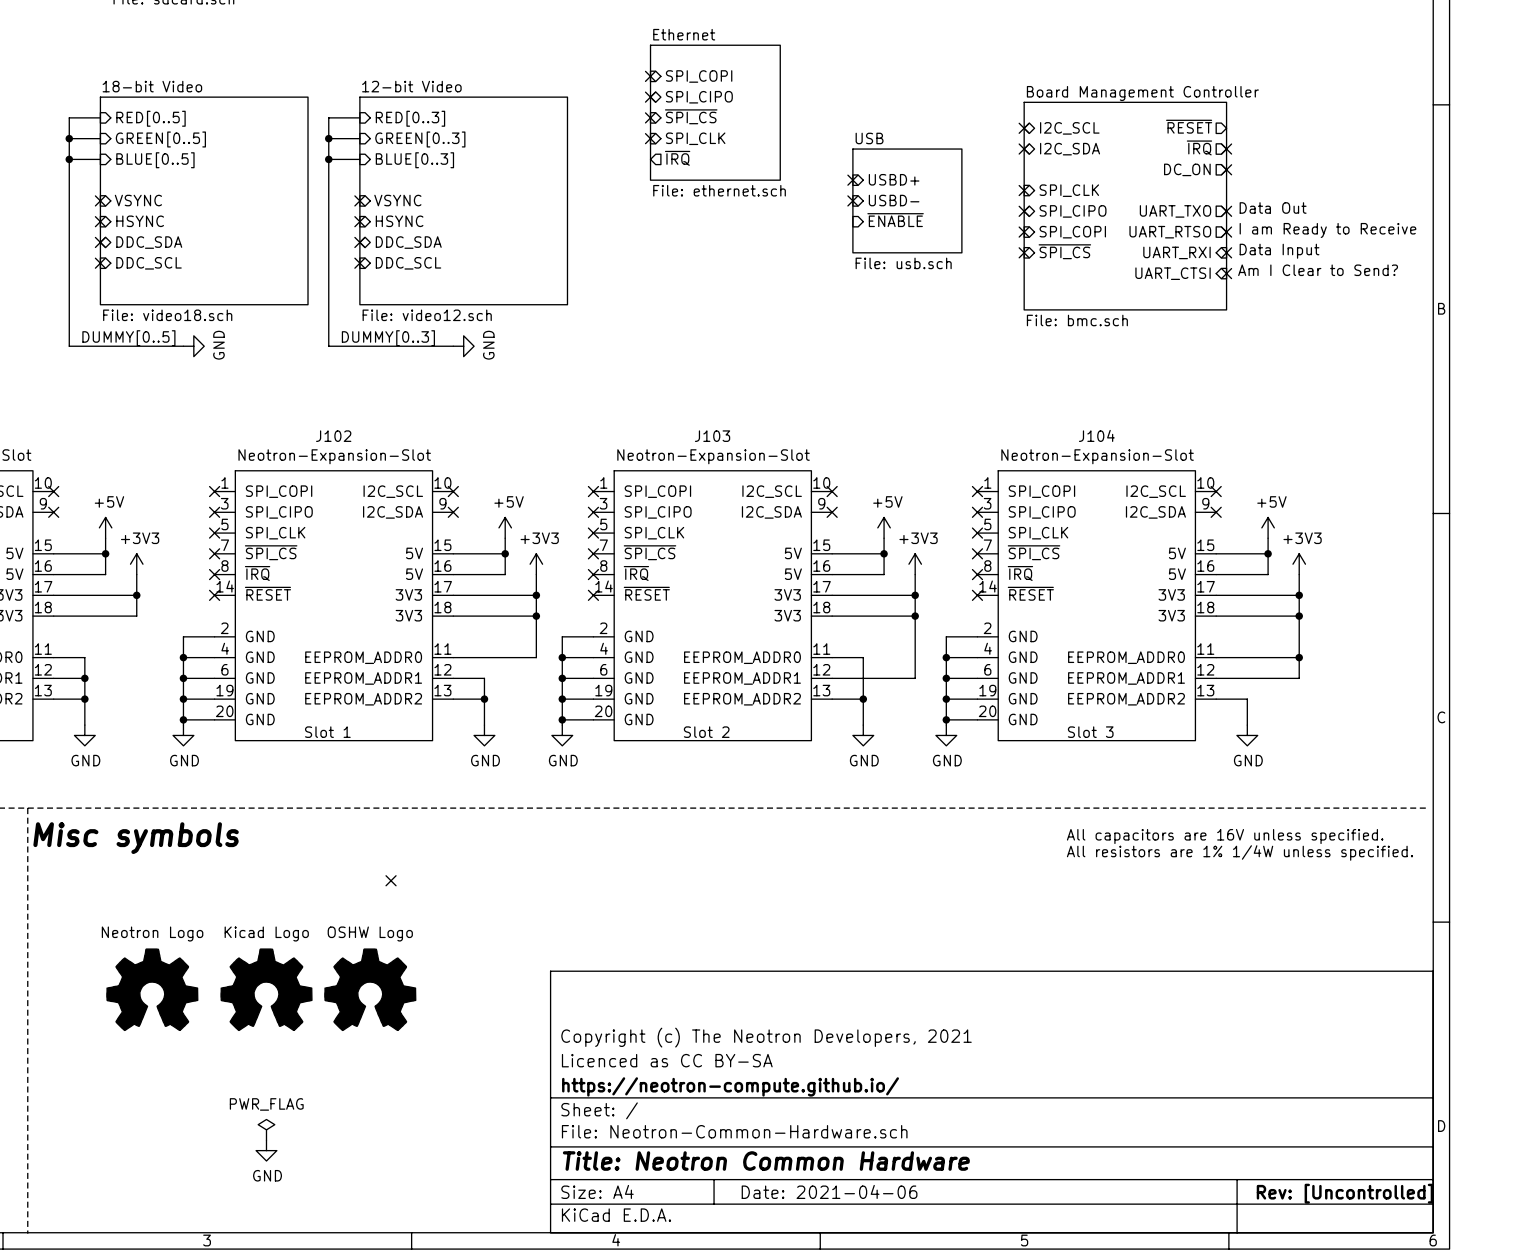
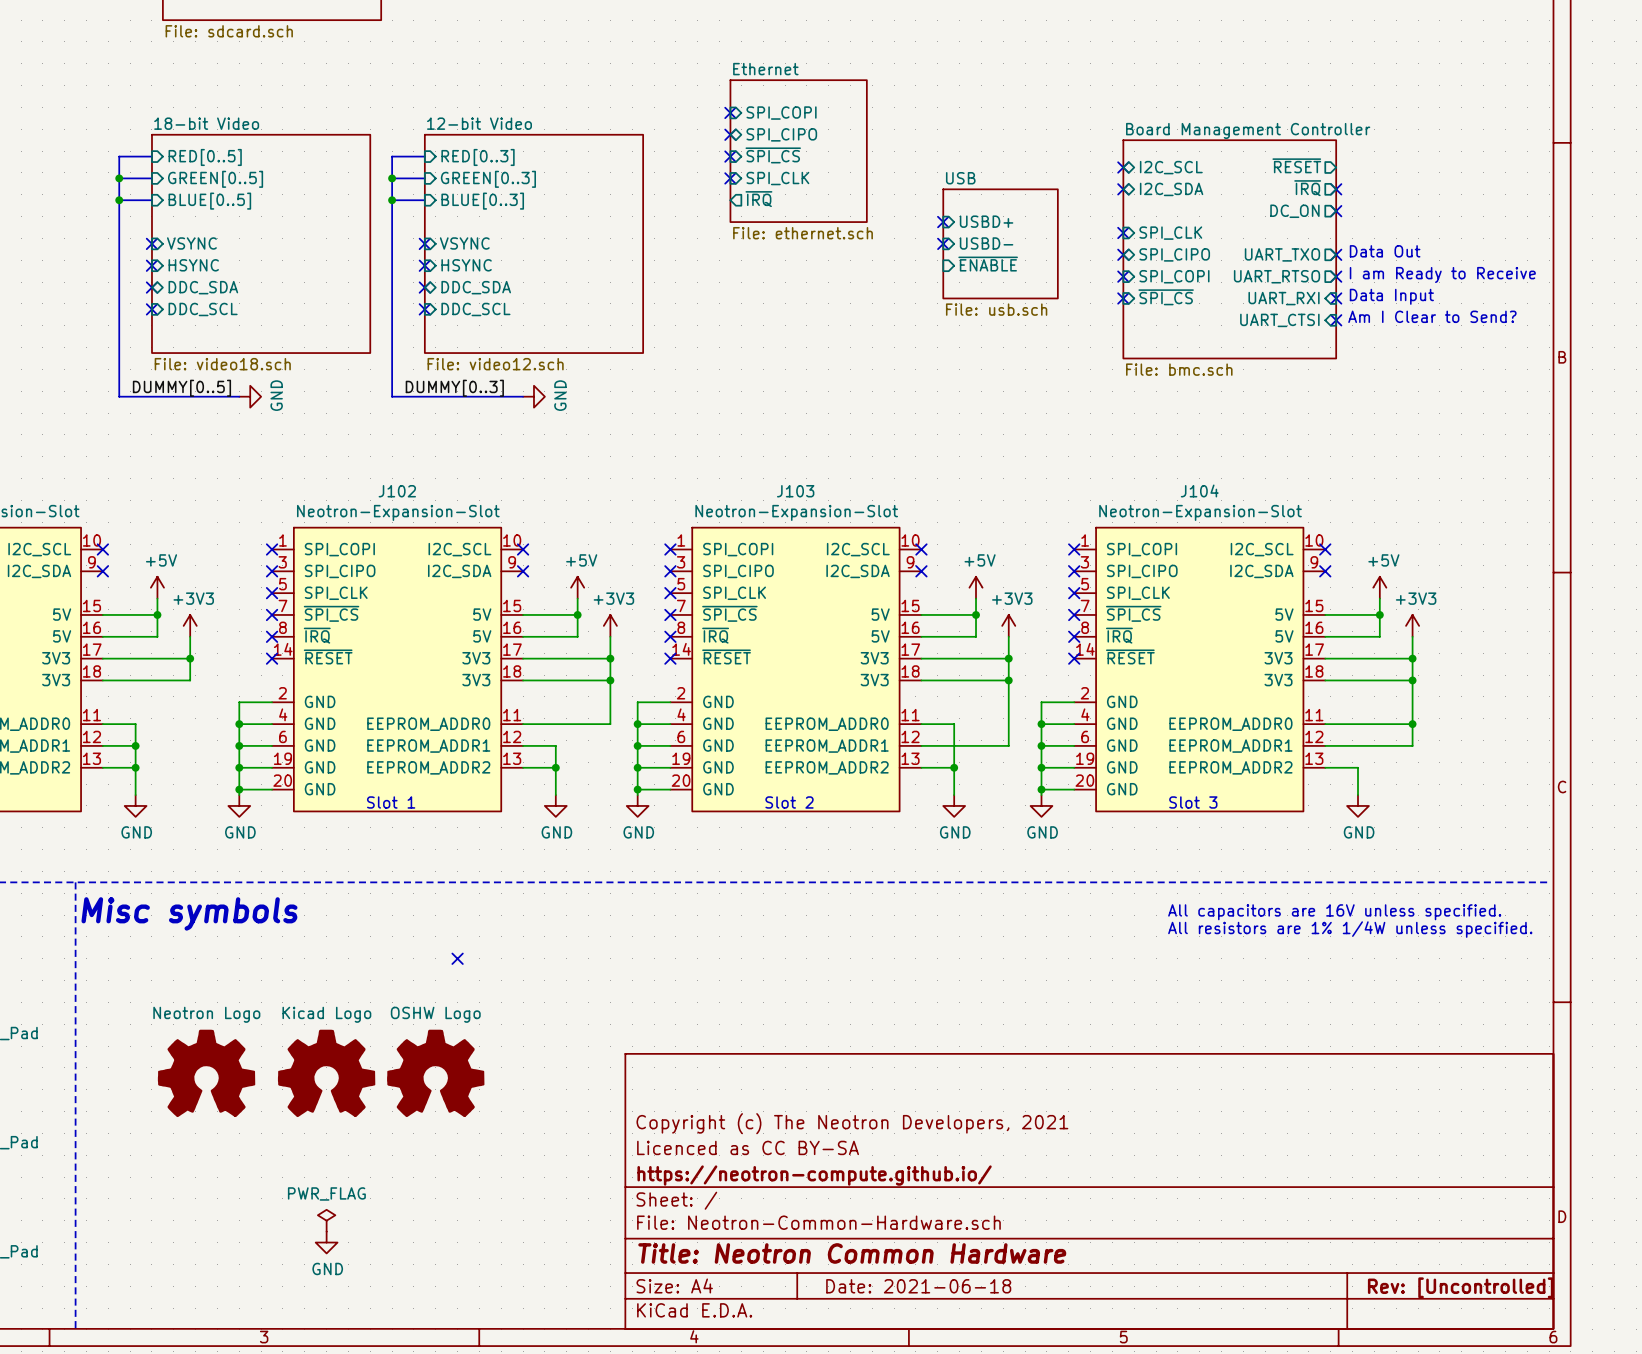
title block: Date: 2021-04-06 (829, 1191) -> Date: 2021-06-18 (918, 1286)

